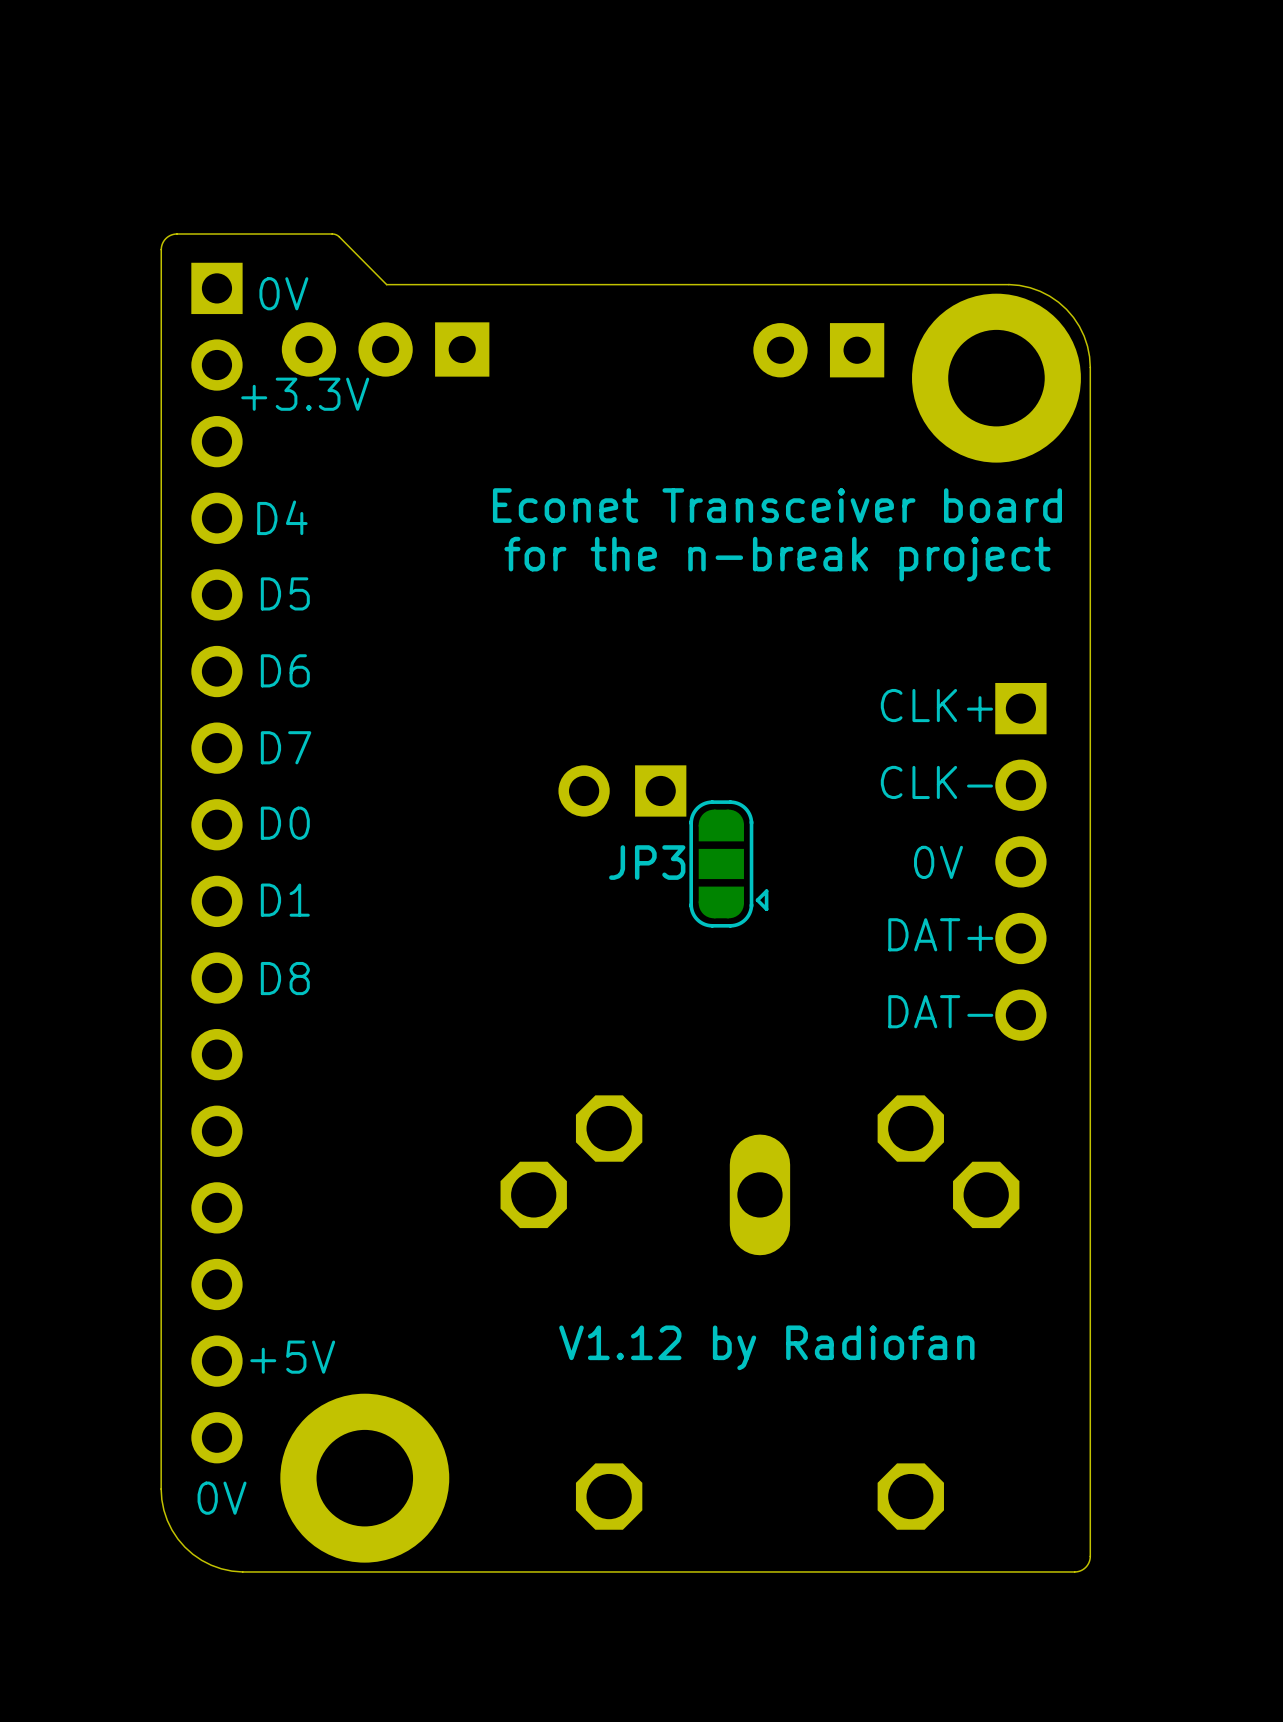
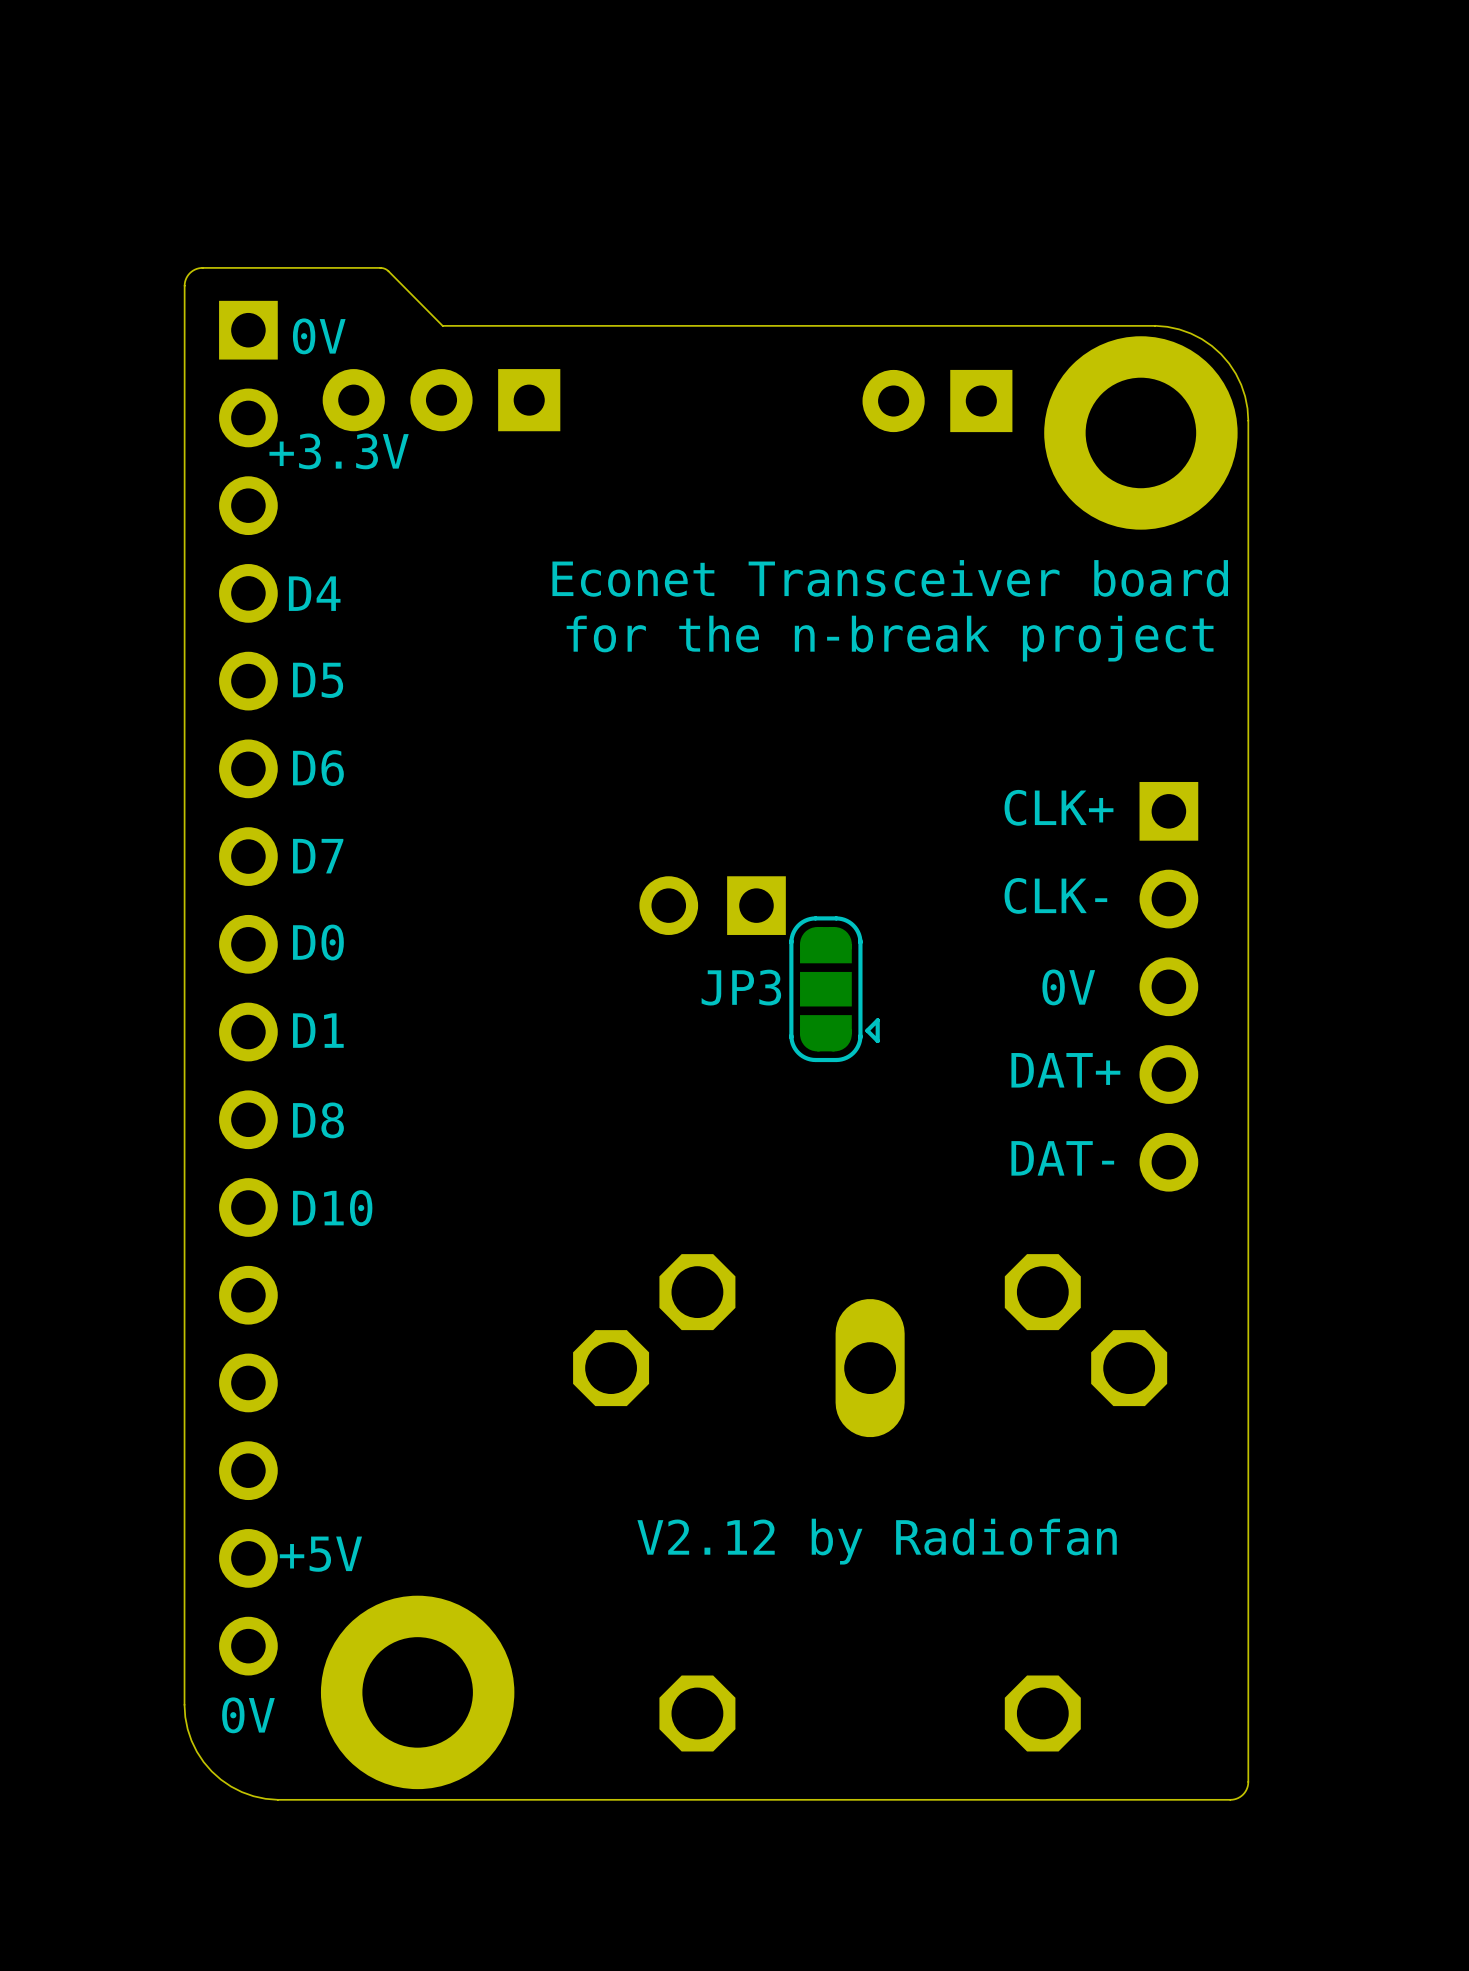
text: none -> D10 (332, 1208)
text: V1.12 by Radiofan (766, 1347) -> V2.12 by Radiofan (877, 1541)

